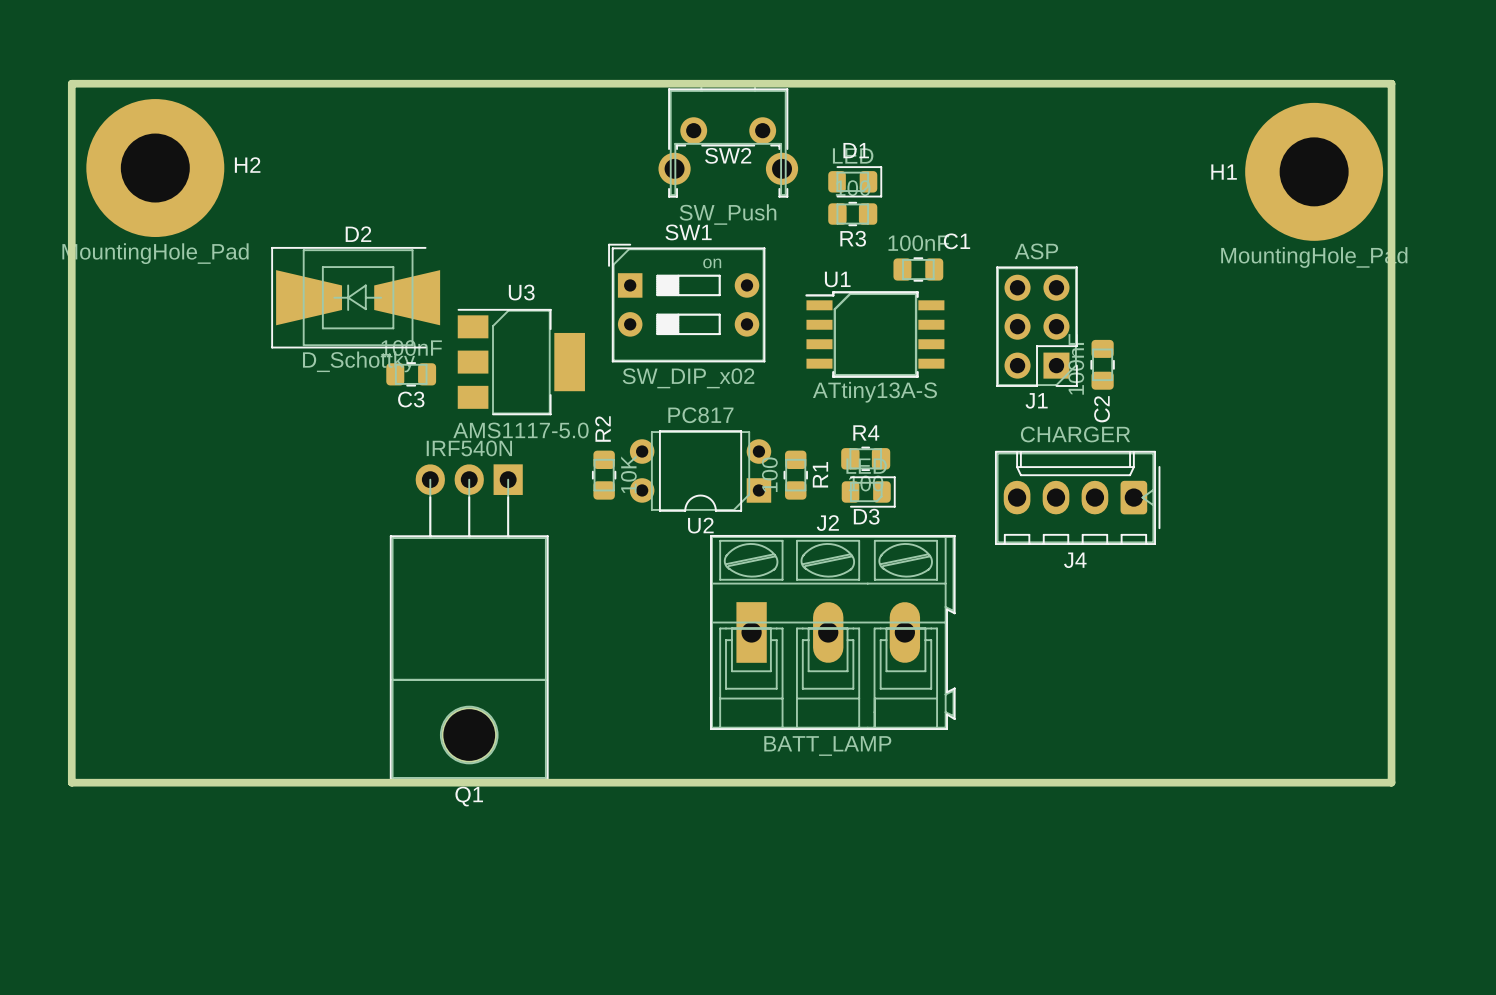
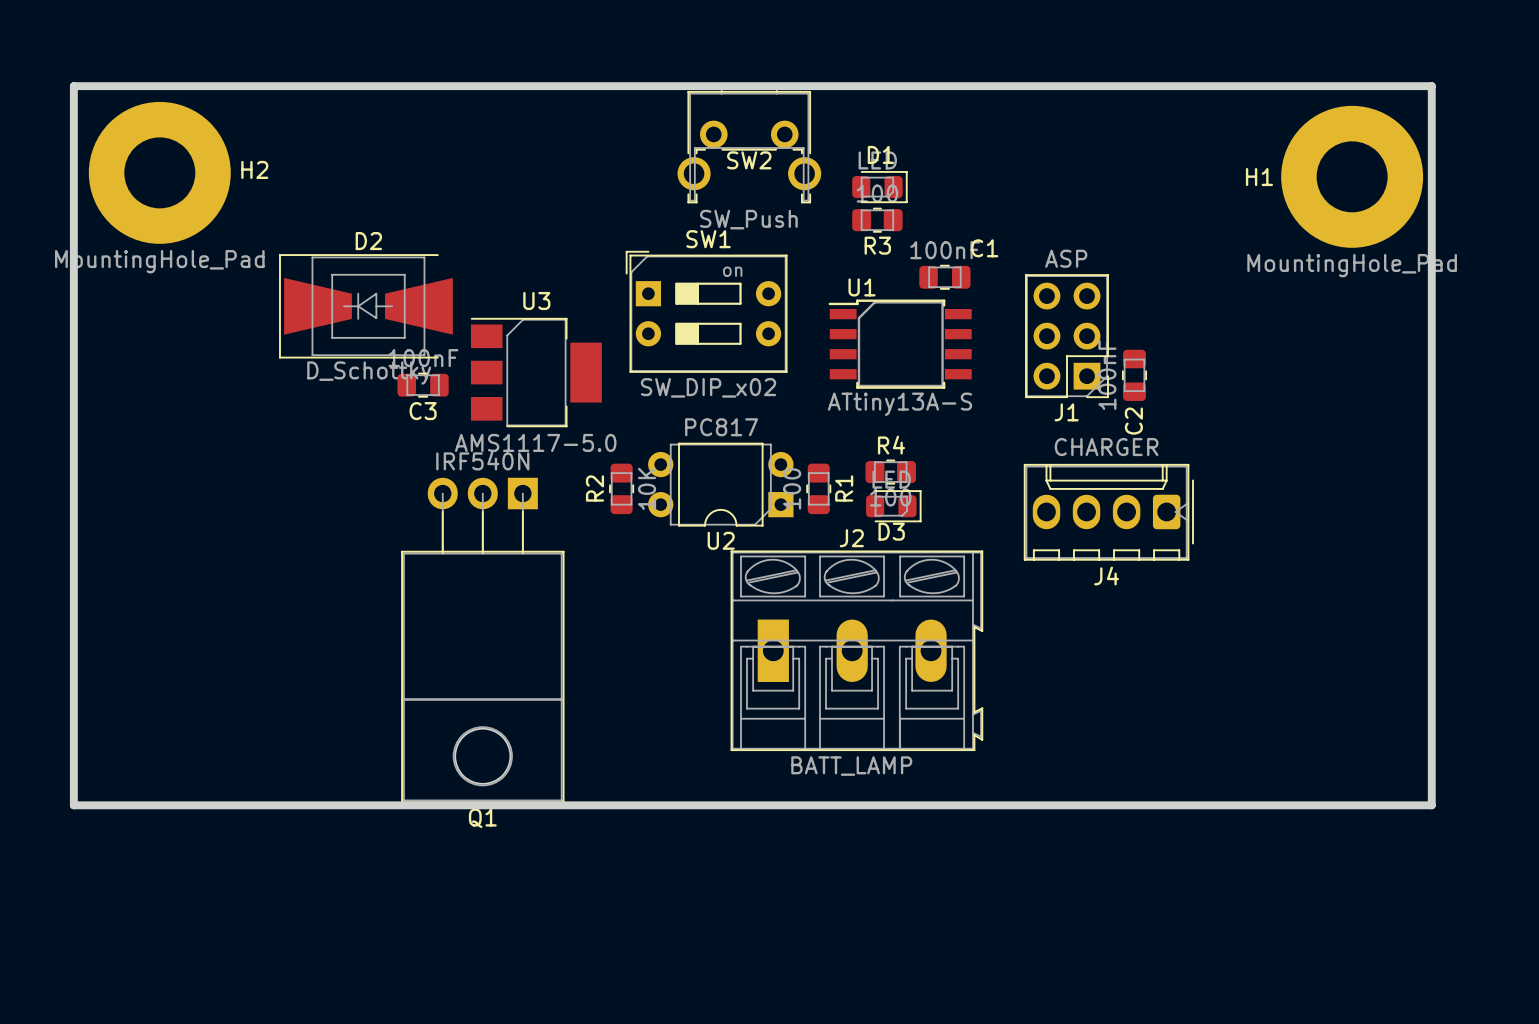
R2 name position: R2 (602, 429) -> R2 (594, 488)

